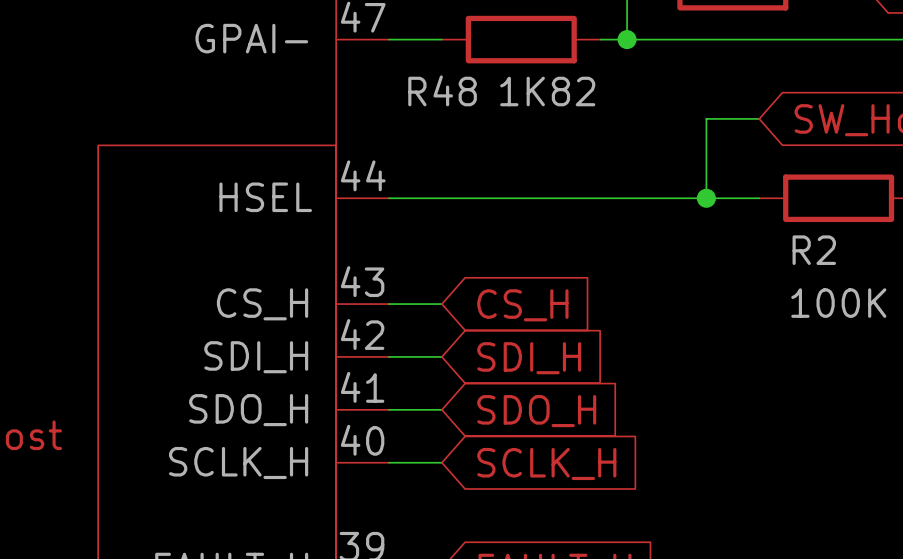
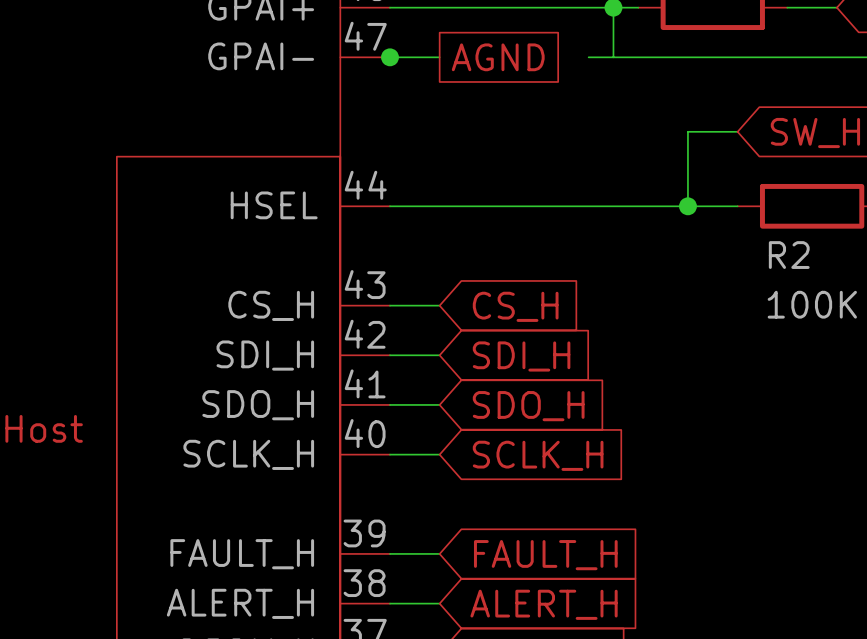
junction: none -> (389, 57)
global label: none -> AGND (498, 57)
R48: 1K82 (521, 39) -> none
junction: (627, 39) -> none

